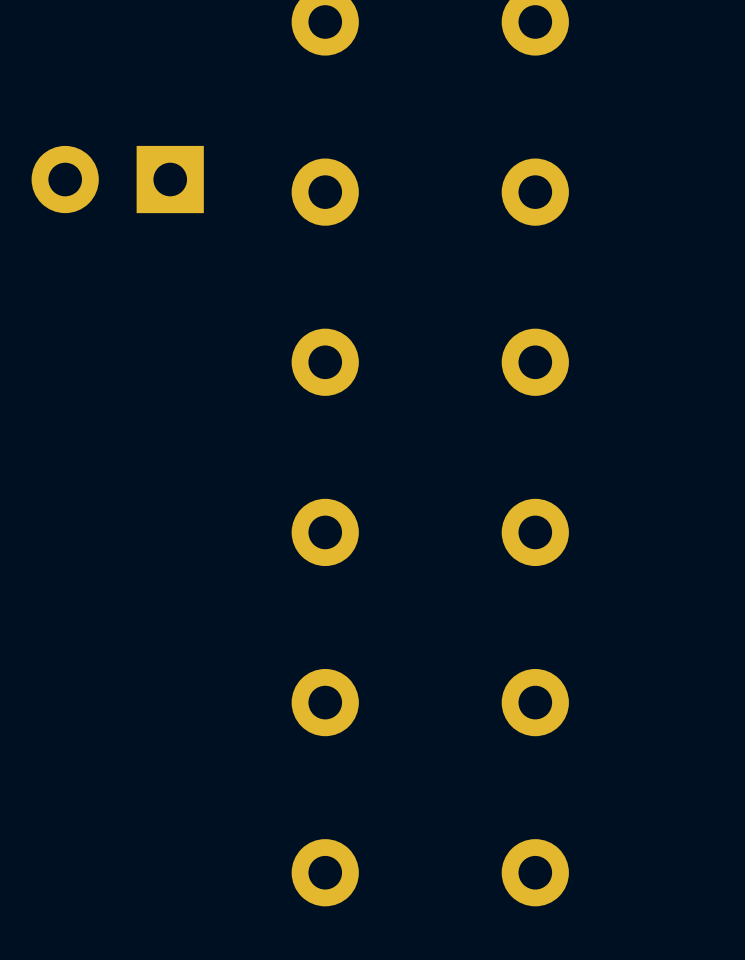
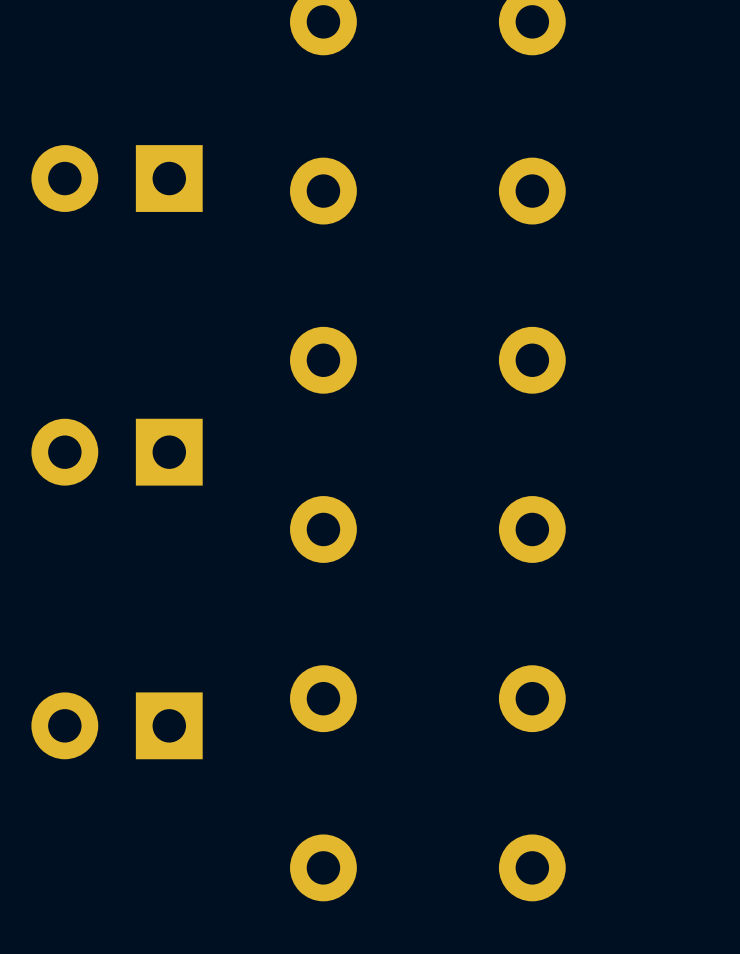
part: none -> (117, 452)
part: none -> (117, 725)

